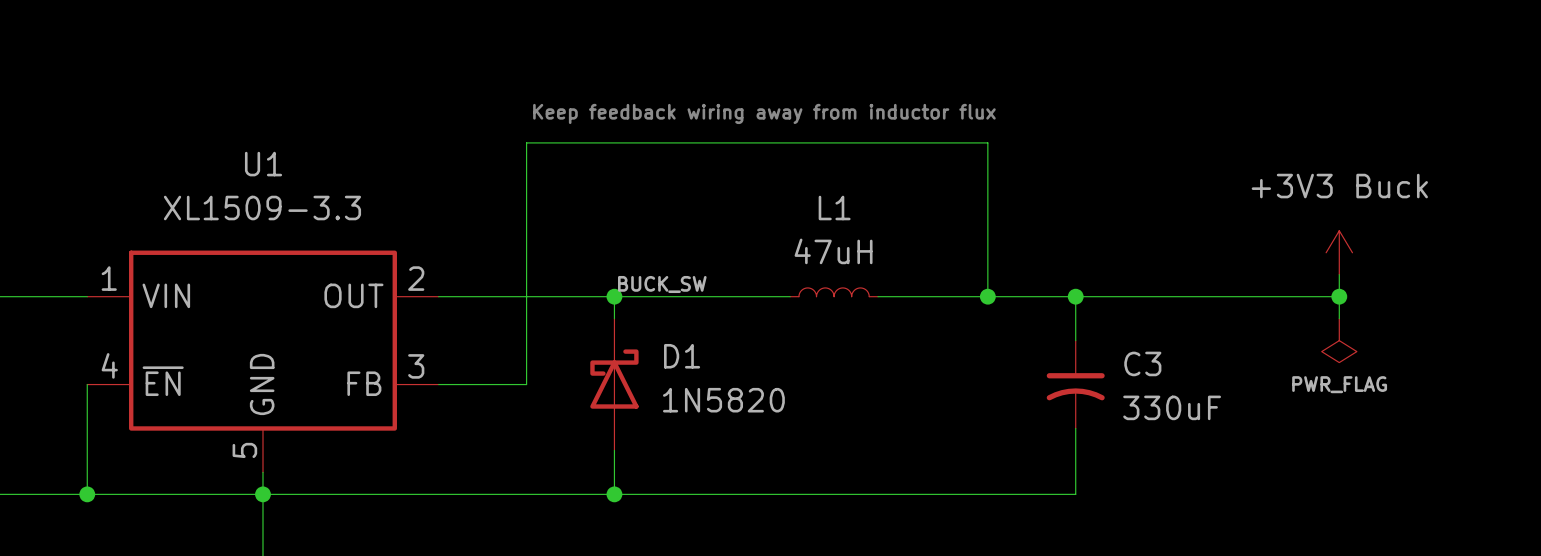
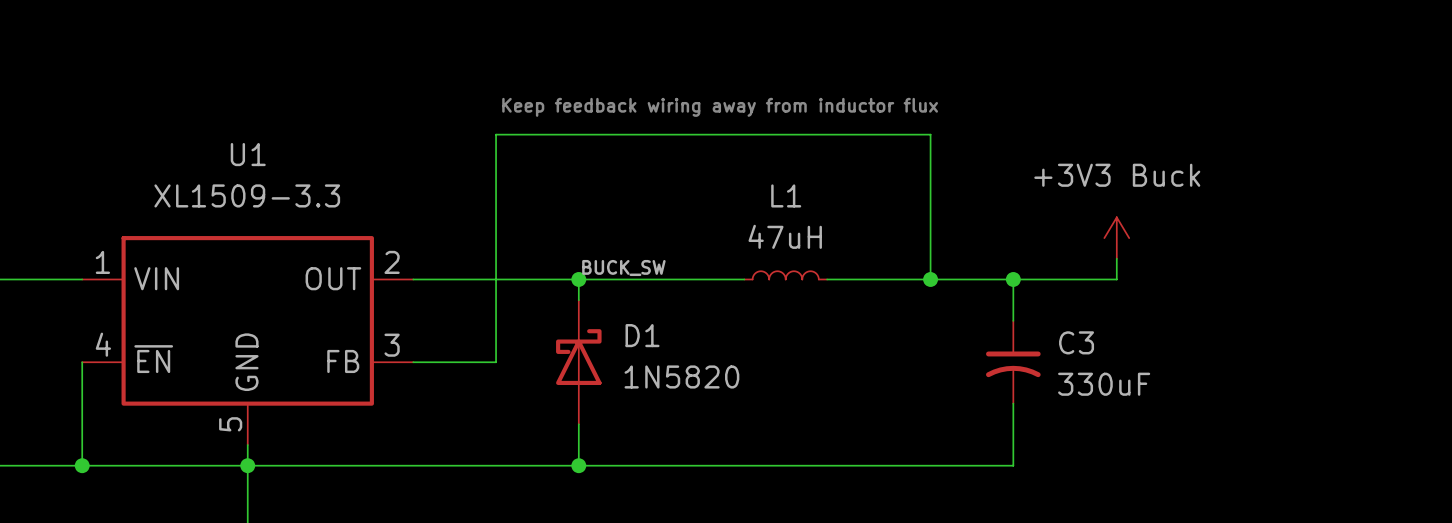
power symbol position: +3V3 Buck (1339, 252) -> +3V3 Buck (1116, 238)
wire: (1339, 274) (1339, 318) -> none
wire: (1185, 296) (1339, 296) -> (1116, 279) (1116, 258)
junction: (1339, 296) -> none
power symbol: PWR_FLAG (1339, 340) -> none

